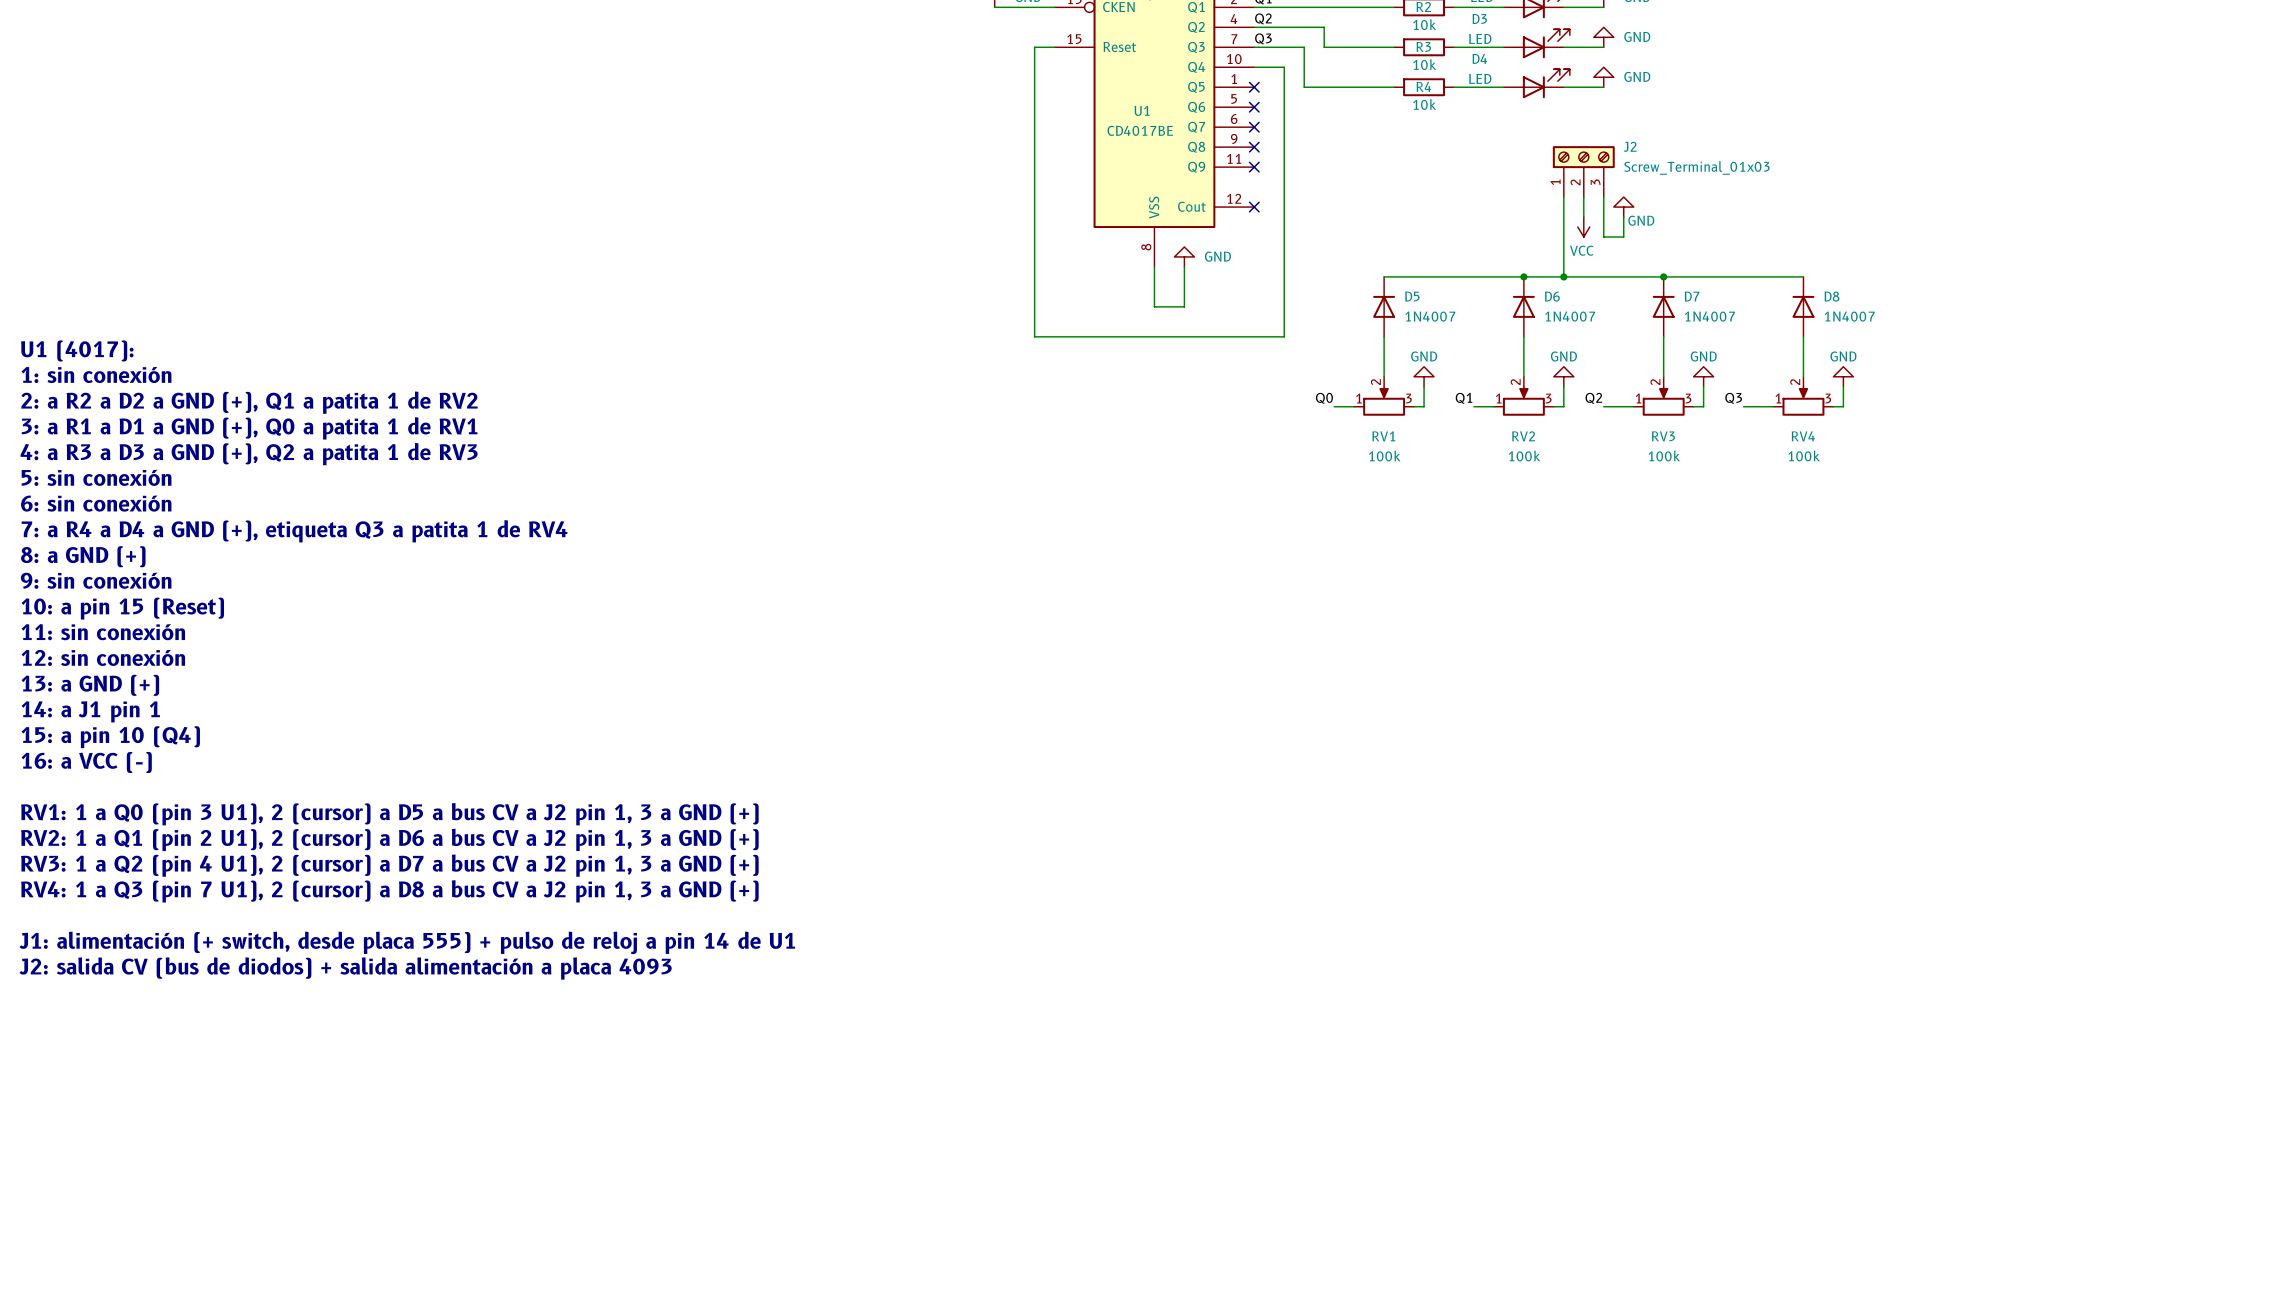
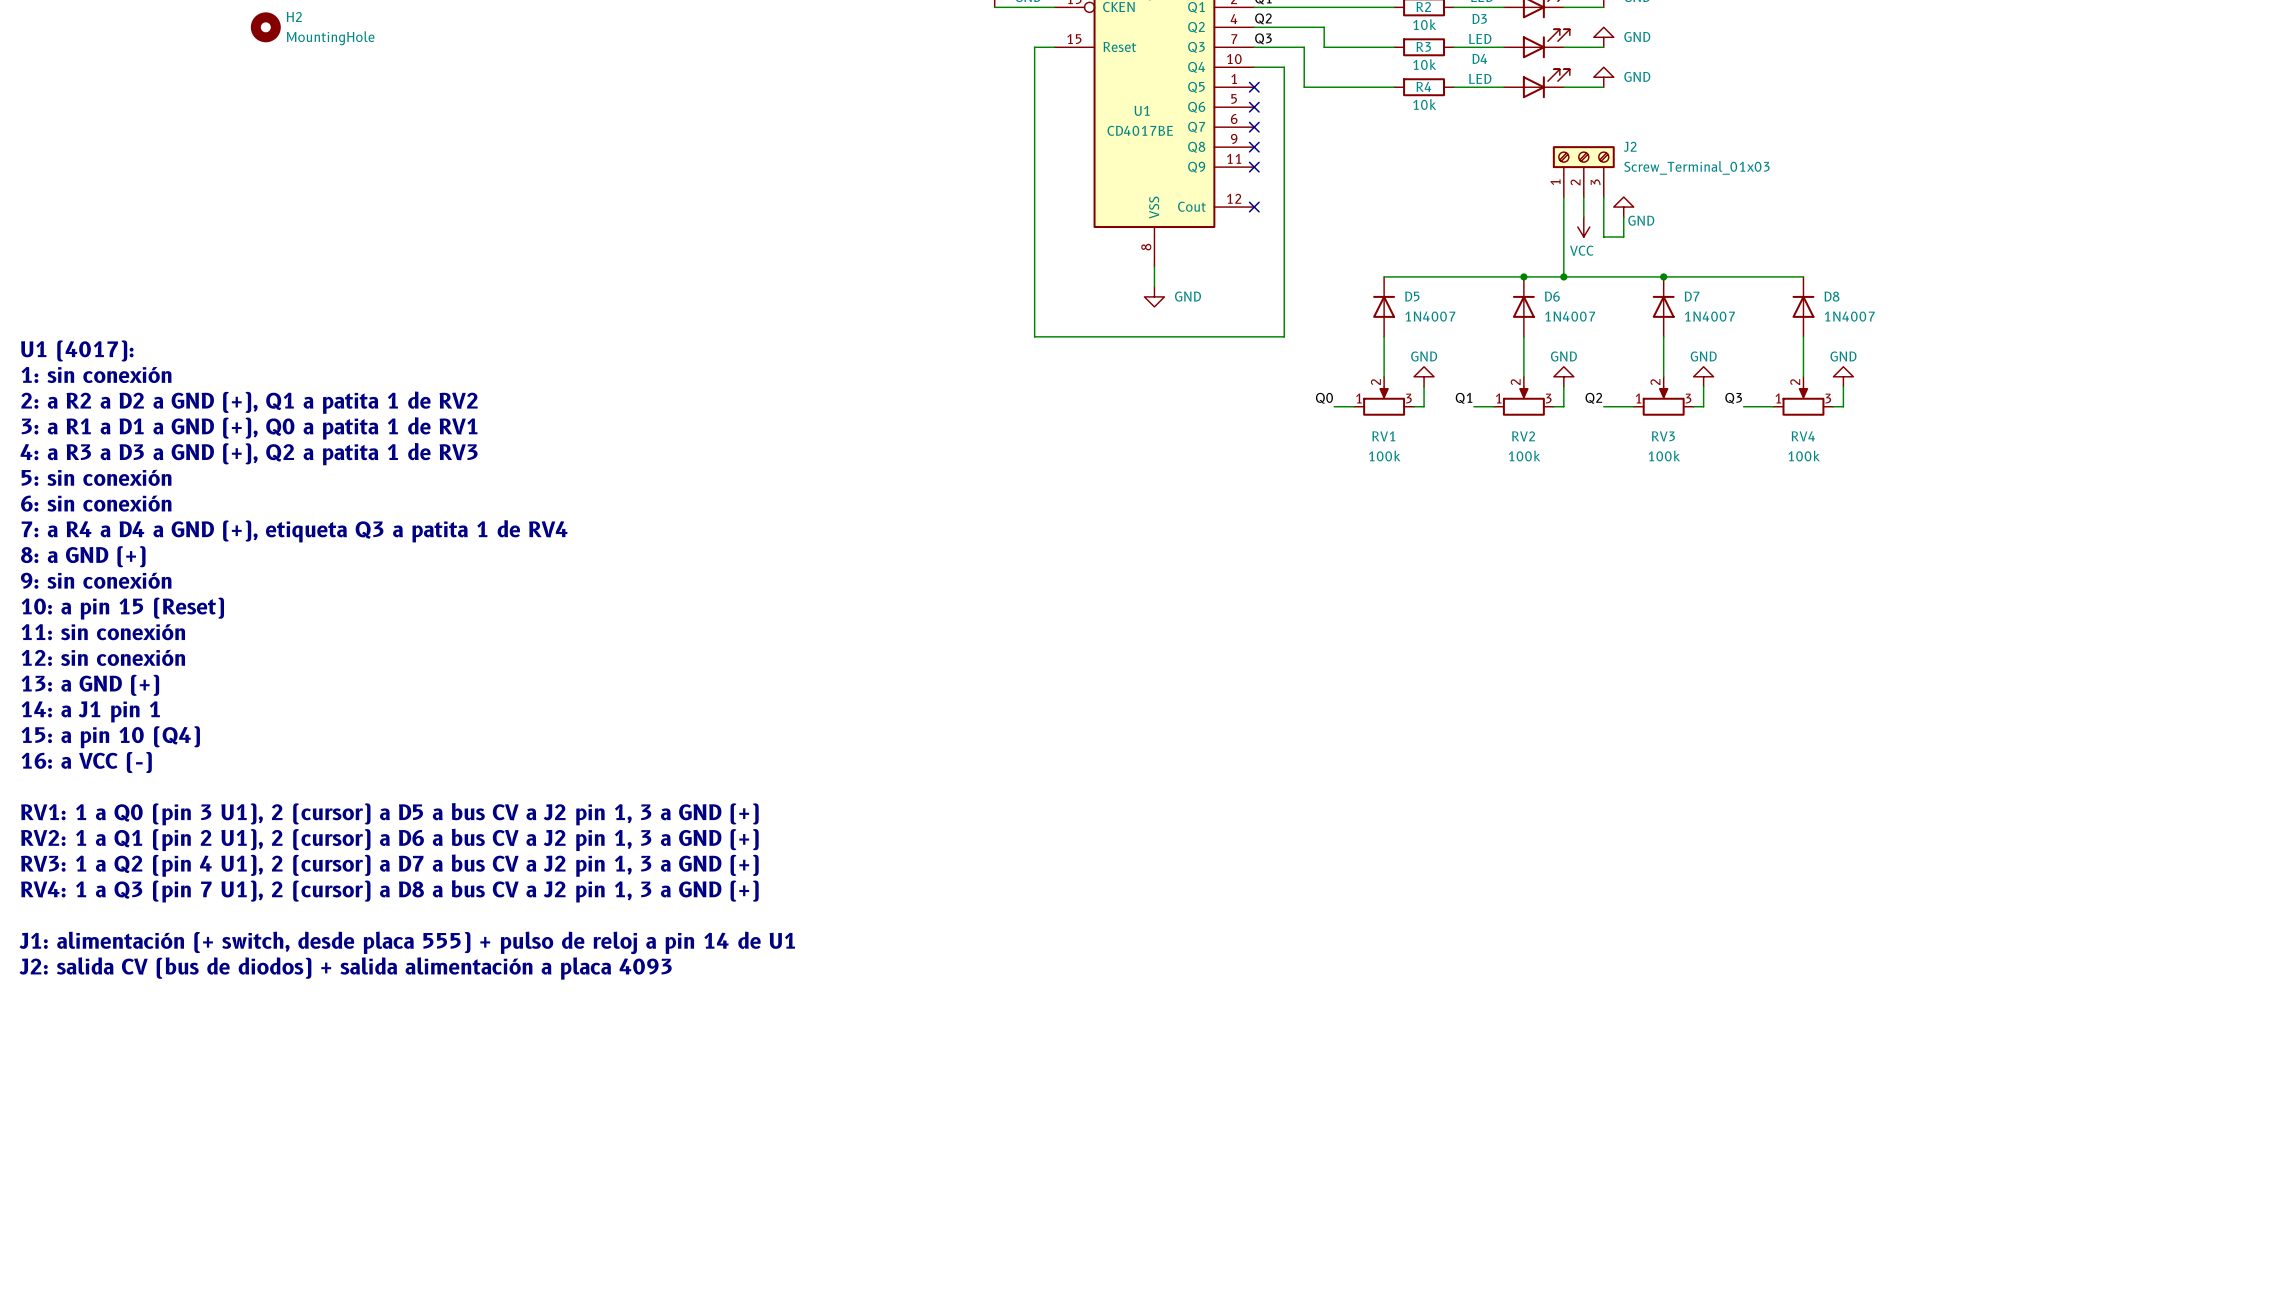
H2: none -> MountingHole (265, 27)
power symbol rotation: 0° (1184, 256) -> 180° (1154, 296)
power symbol position: GND (1184, 256) -> GND (1154, 296)
wire: (1184, 266) (1184, 306) (1154, 306) (1154, 286) -> none

